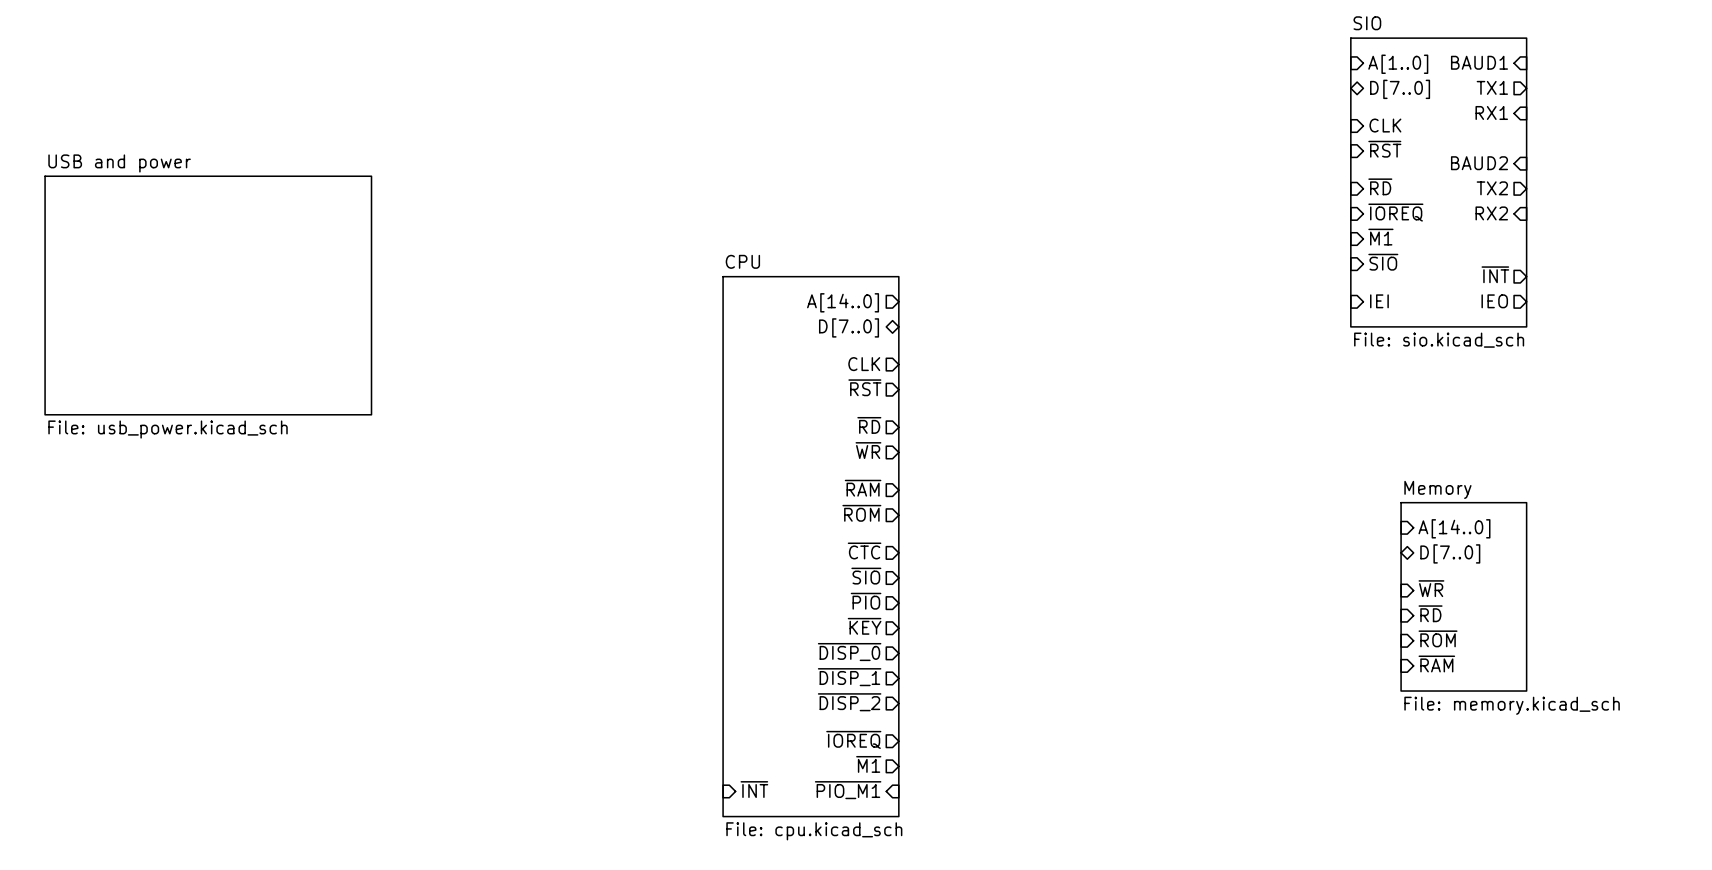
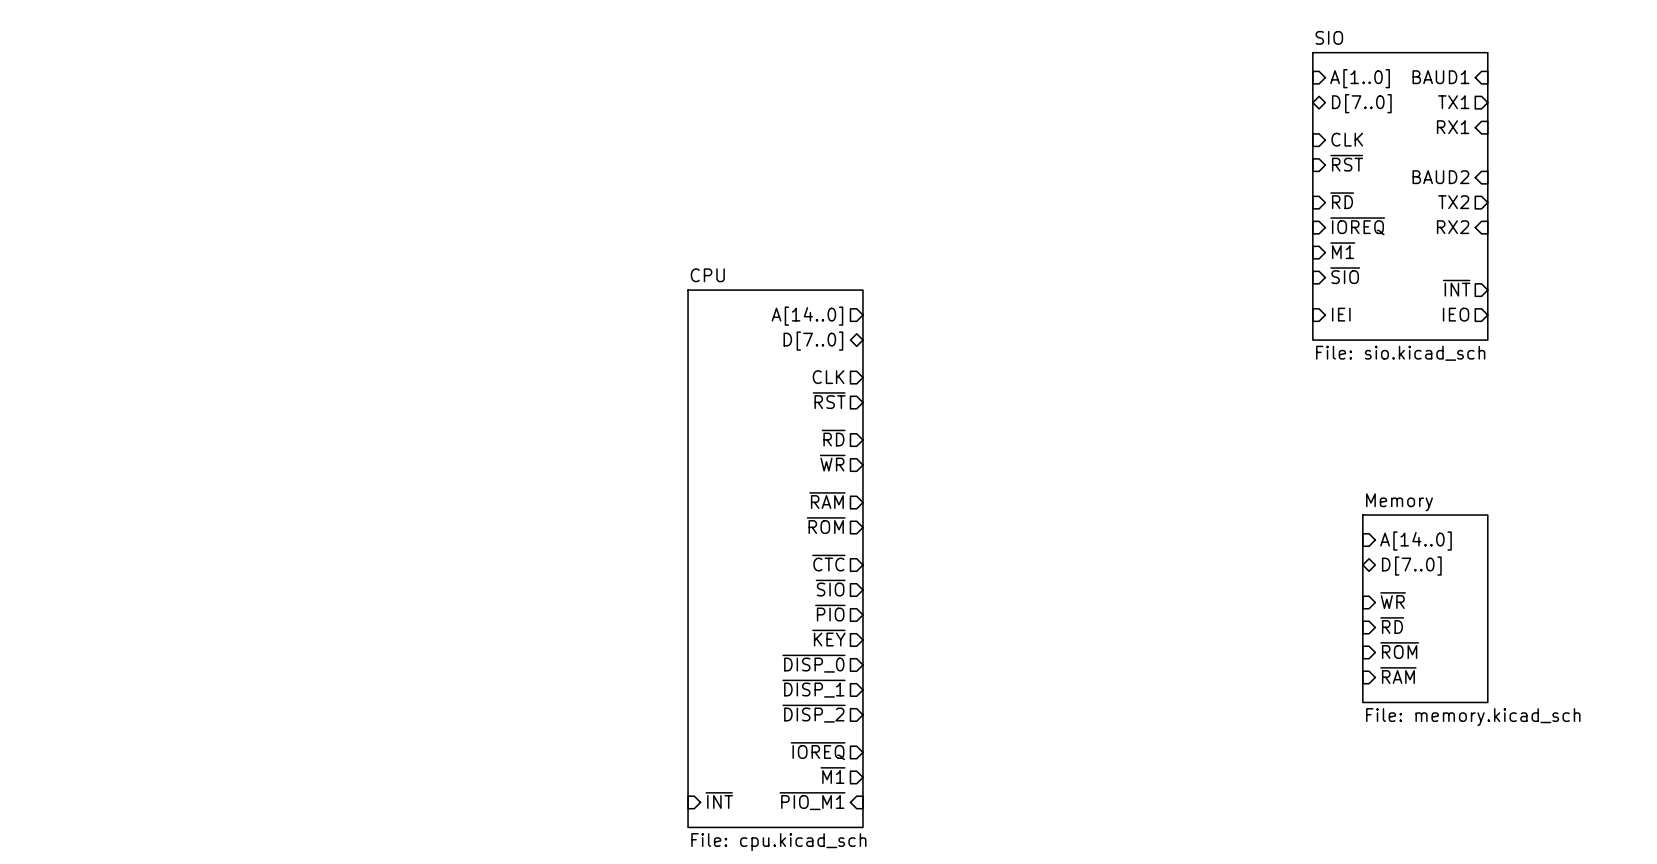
sheet USB and power: File: usb_power.kicad_sch (208, 295) -> none

